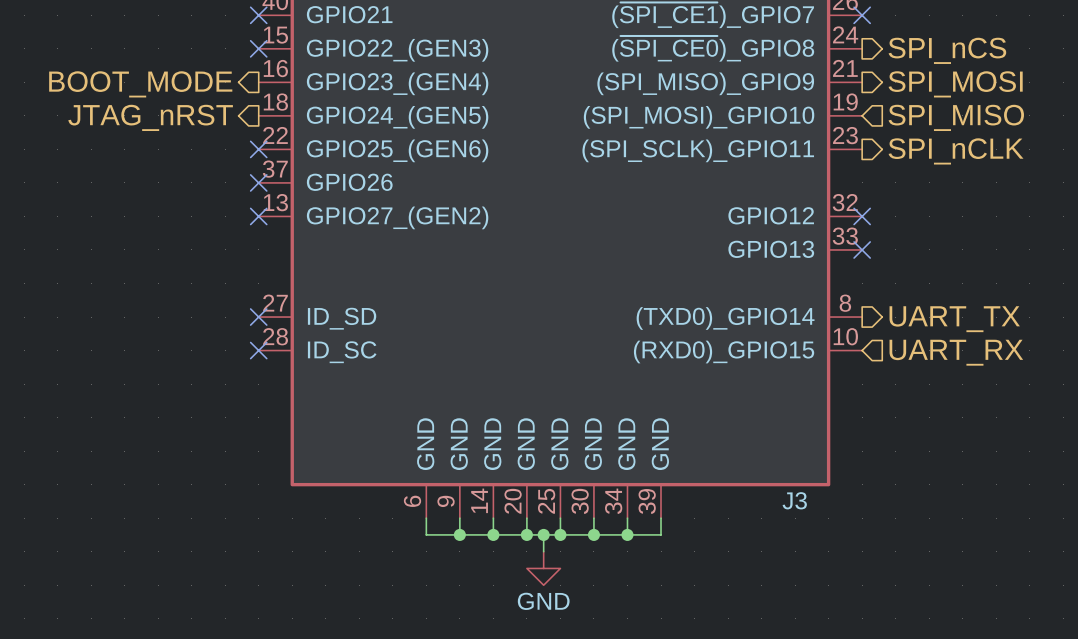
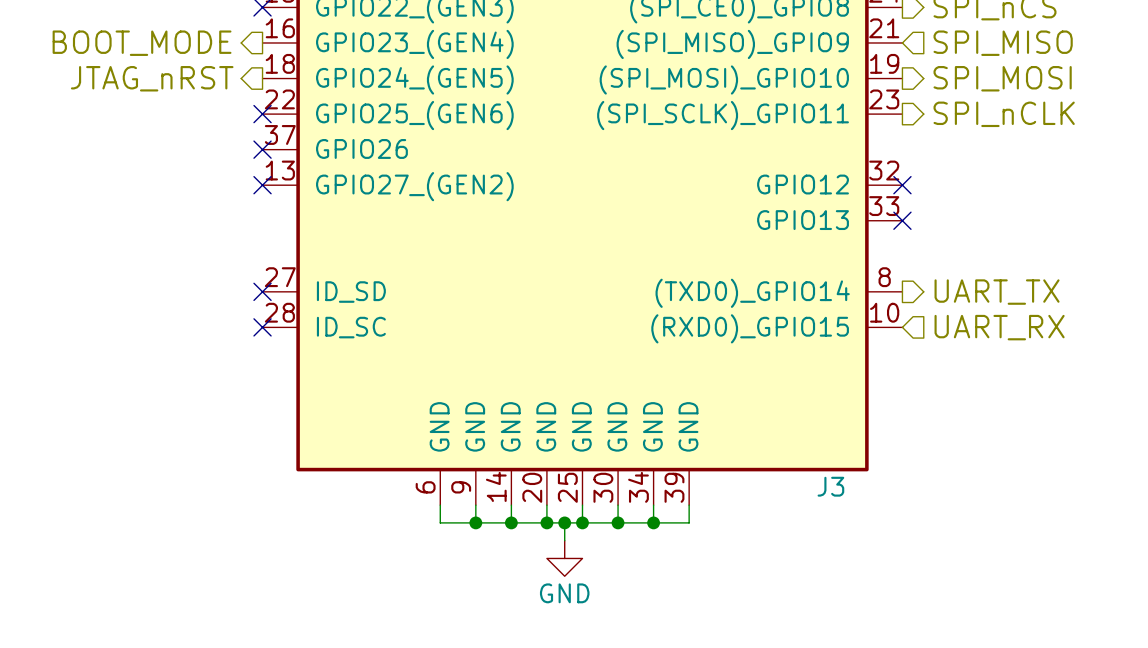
hierarchical label shape: output (955, 84) -> input (1003, 43)
hierarchical label: SPI_MOSI (955, 84) -> SPI_MISO (1003, 43)
hierarchical label shape: input (956, 117) -> output (1002, 78)
hierarchical label: SPI_MISO (956, 117) -> SPI_MOSI (1002, 78)

